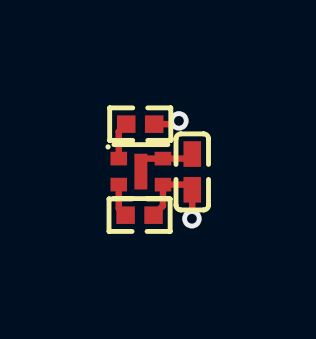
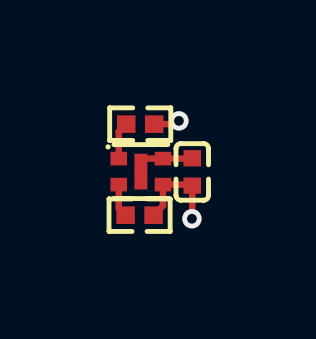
part footprint: [173, 131, 211, 213] -> [173, 141, 211, 203]

